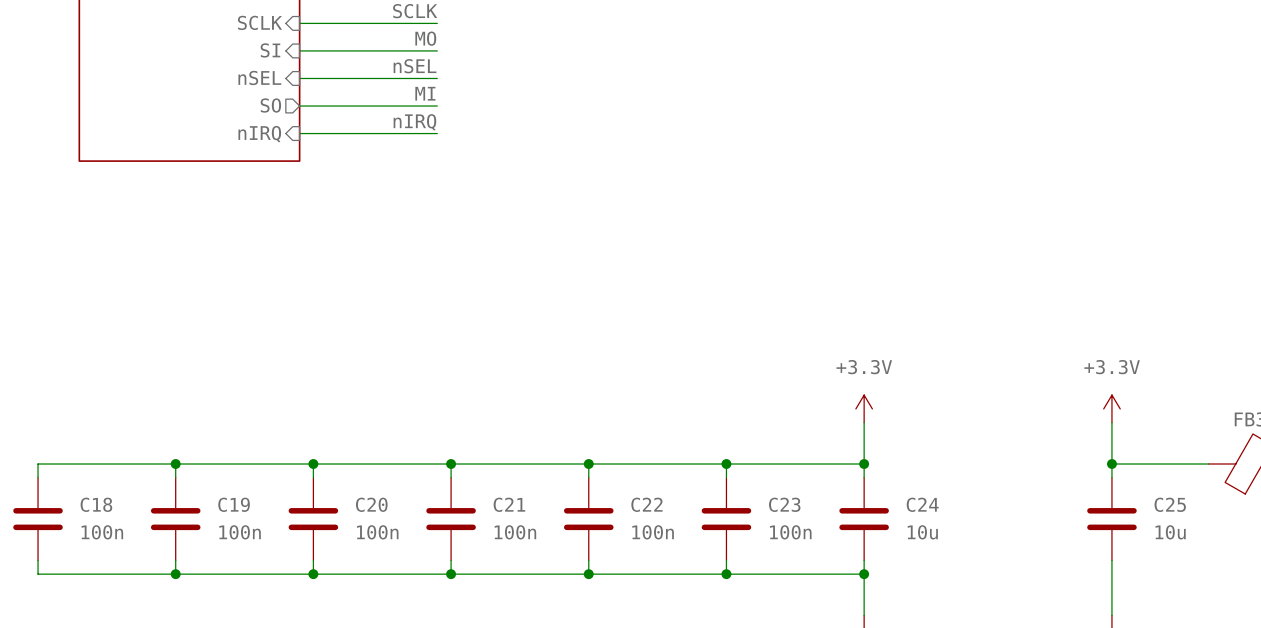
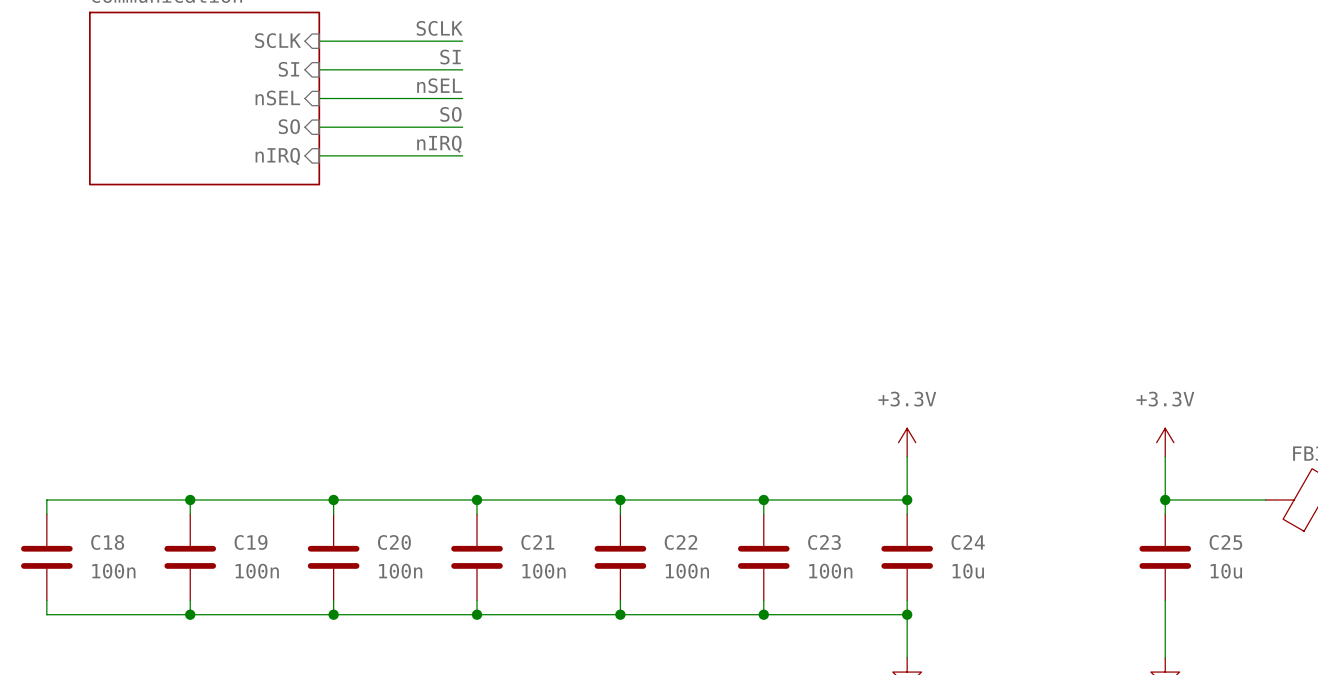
label: MO (425, 38) -> SI (450, 57)
label: MI (425, 93) -> SO (450, 114)
sheet pin shape: output (270, 105) -> input (289, 126)

